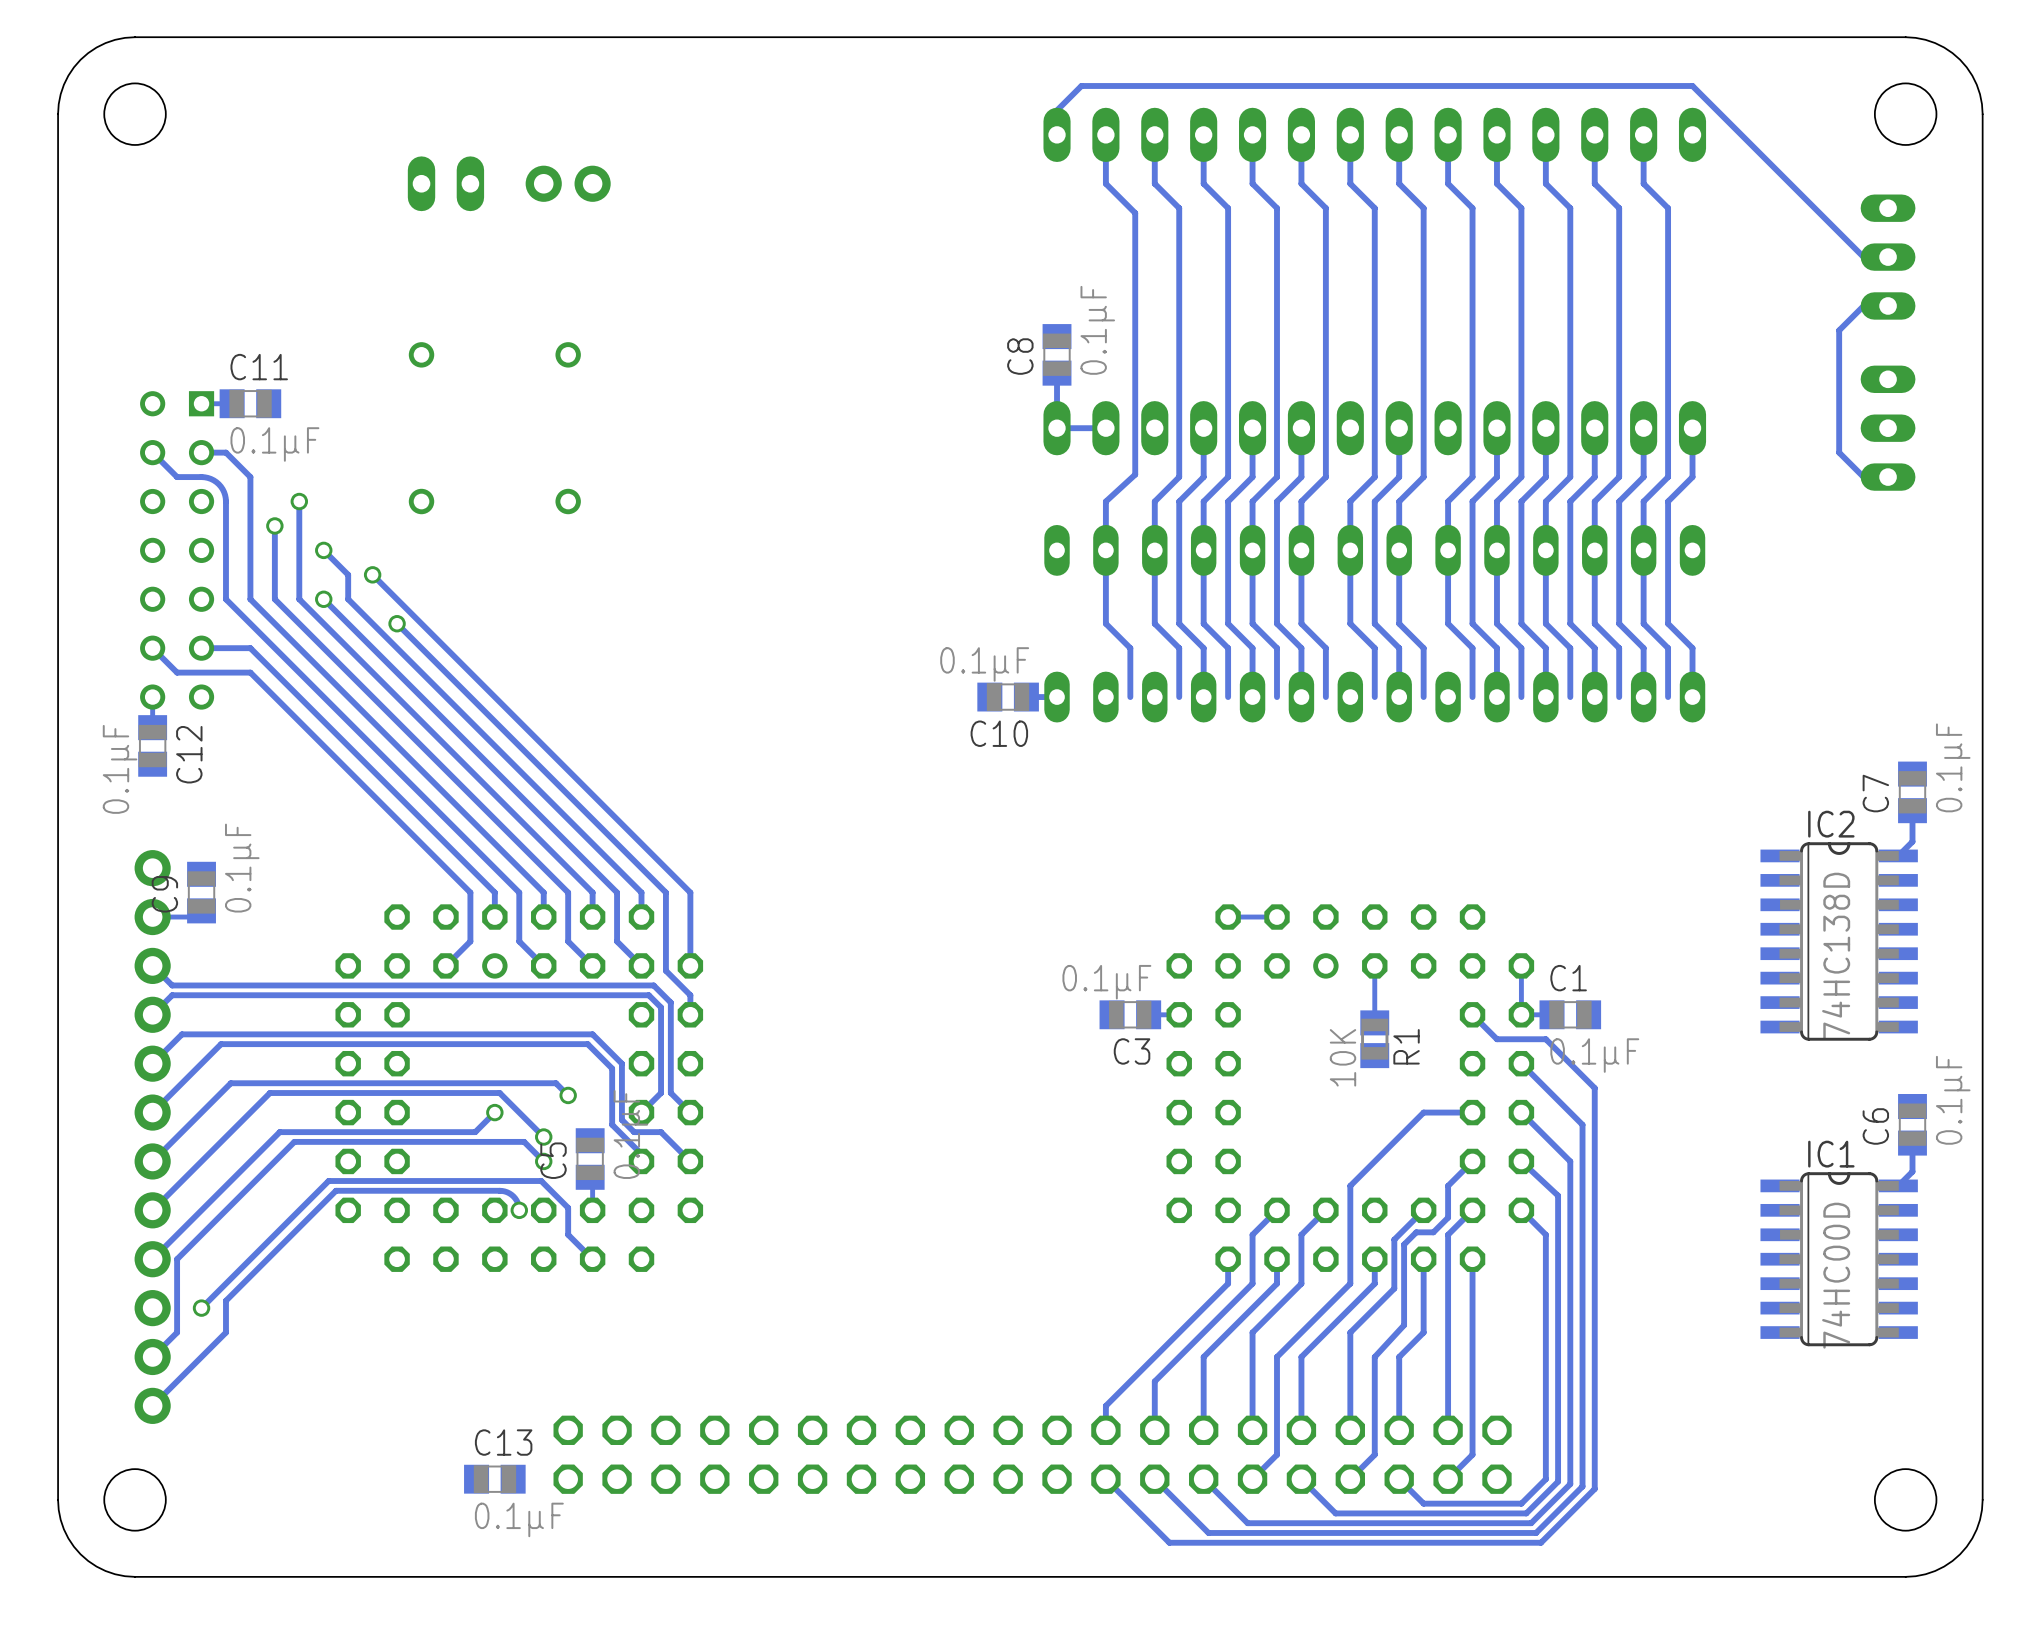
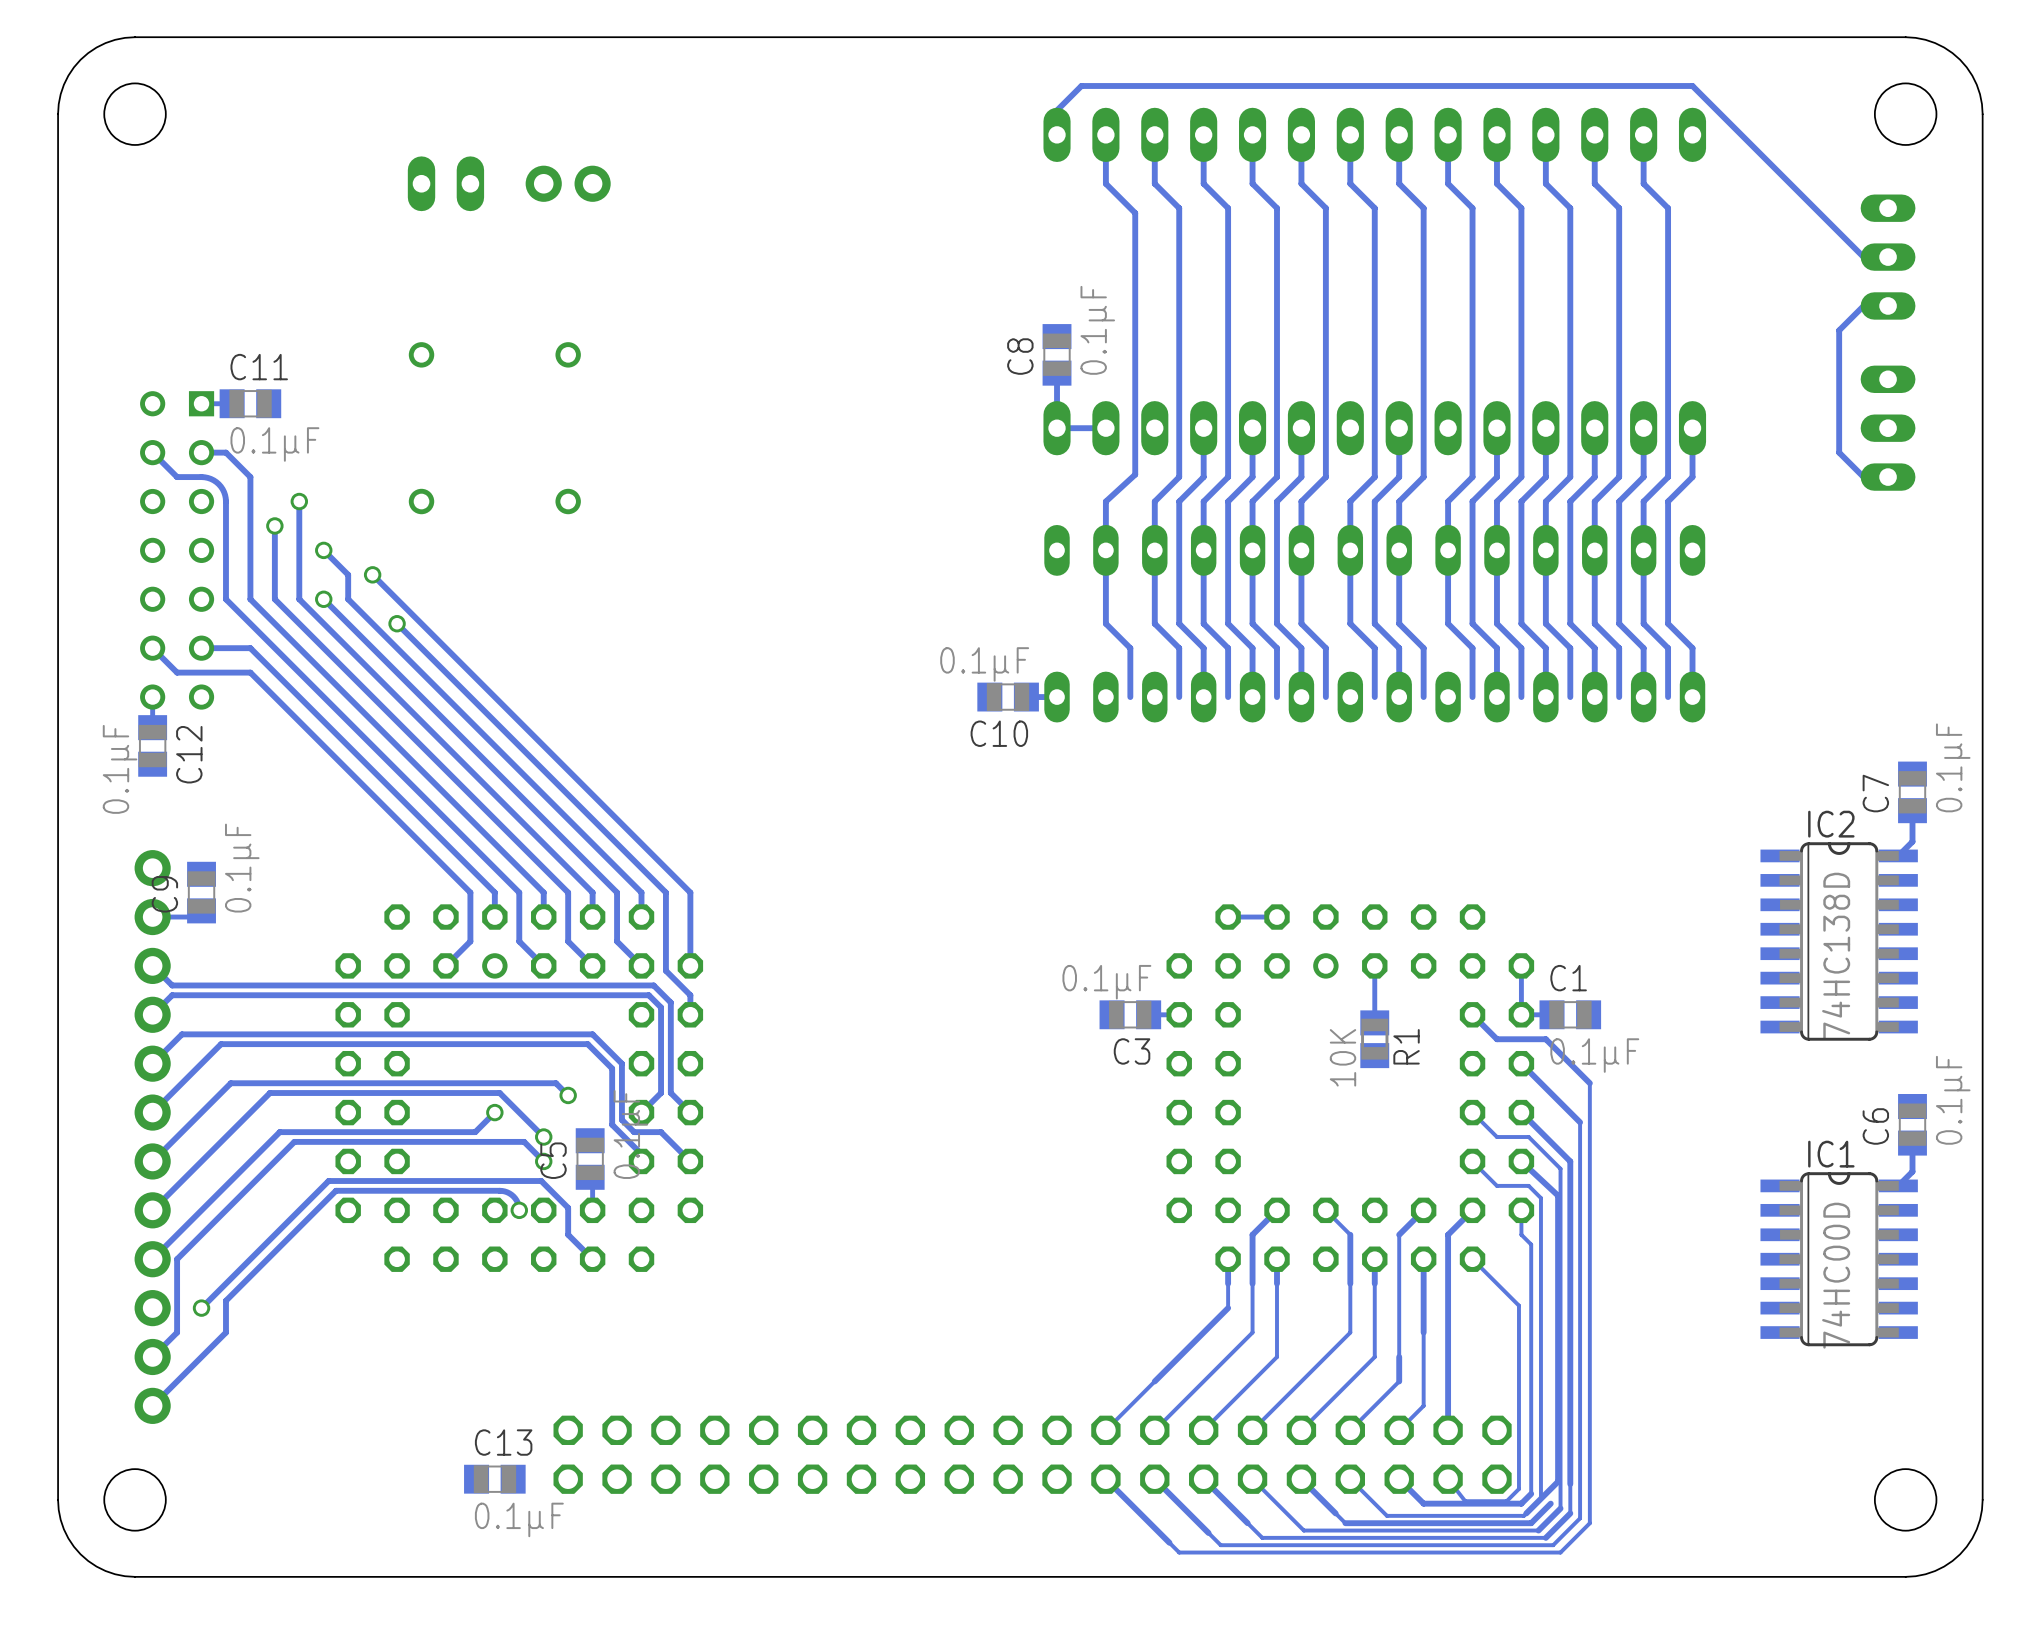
track: (1589, 1083) (1594, 1088) (1594, 1488) (1570, 1513) -> (1589, 1083) (1589, 1523) (1560, 1552) (1179, 1552) (1169, 1542)
track: (1472, 1112) (1423, 1112) (1350, 1185) (1350, 1234) -> (1325, 1210) (1350, 1234)
track: (1580, 1122) (1582, 1124) (1582, 1486) (1560, 1508) -> (1472, 1112) (1496, 1137) (1528, 1137) (1560, 1168) (1560, 1508)
track: none -> (1580, 1122) (1580, 1518) (1553, 1545) (1220, 1545) (1208, 1532)
track: (1472, 1161) (1448, 1185) (1448, 1217) (1433, 1232) (1416, 1232) (1404, 1244) (1404, 1325) (1374, 1356) (1374, 1454) (1350, 1479) -> (1472, 1161) (1496, 1185) (1528, 1185) (1540, 1198) (1540, 1498)
track: (1325, 1210) (1301, 1234) (1301, 1283) (1252, 1332) (1252, 1430) -> none
track: (1521, 1210) (1545, 1234) (1545, 1479) (1531, 1493) -> (1521, 1210) (1521, 1234) (1531, 1244) (1531, 1493)
track: (1399, 1234) (1394, 1239) (1394, 1288) (1350, 1332) (1350, 1430) -> (1399, 1234) (1399, 1356)
track: (1472, 1259) (1472, 1454) (1448, 1479) -> (1472, 1259) (1518, 1305) (1518, 1488) (1506, 1501) (1465, 1501) (1448, 1479)
track: (1228, 1283) (1105, 1405) (1105, 1430) -> none
track: (1252, 1283) (1228, 1308) -> (1228, 1283) (1228, 1308)
track: none -> (1252, 1283) (1252, 1332) (1154, 1430)
track: (1276, 1283) (1203, 1356) (1203, 1430) -> (1276, 1283) (1276, 1356) (1203, 1430)
track: (1350, 1283) (1276, 1356) (1276, 1454) (1252, 1479) -> (1350, 1283) (1350, 1332) (1252, 1430)
track: (1374, 1283) (1301, 1356) (1301, 1430) -> (1374, 1283) (1374, 1356) (1301, 1430)
track: (1423, 1332) (1399, 1356) -> (1423, 1332) (1423, 1405) (1399, 1430)
track: (1154, 1381) (1154, 1430) -> (1154, 1381) (1105, 1430)
track: (1399, 1381) (1399, 1430) -> (1399, 1381) (1350, 1430)
track: (1570, 1484) (1550, 1503) -> (1570, 1484) (1570, 1513)
track: (1526, 1513) (1335, 1513) -> (1526, 1513) (1523, 1515) (1386, 1515) (1350, 1479)
track: (1345, 1523) (1247, 1523) -> (1345, 1523) (1335, 1513)
track: (1538, 1530) (1536, 1532) (1208, 1532) -> (1538, 1530) (1303, 1530) (1252, 1479)
track: (1545, 1537) (1540, 1542) (1169, 1542) -> (1545, 1537) (1262, 1537) (1247, 1523)

